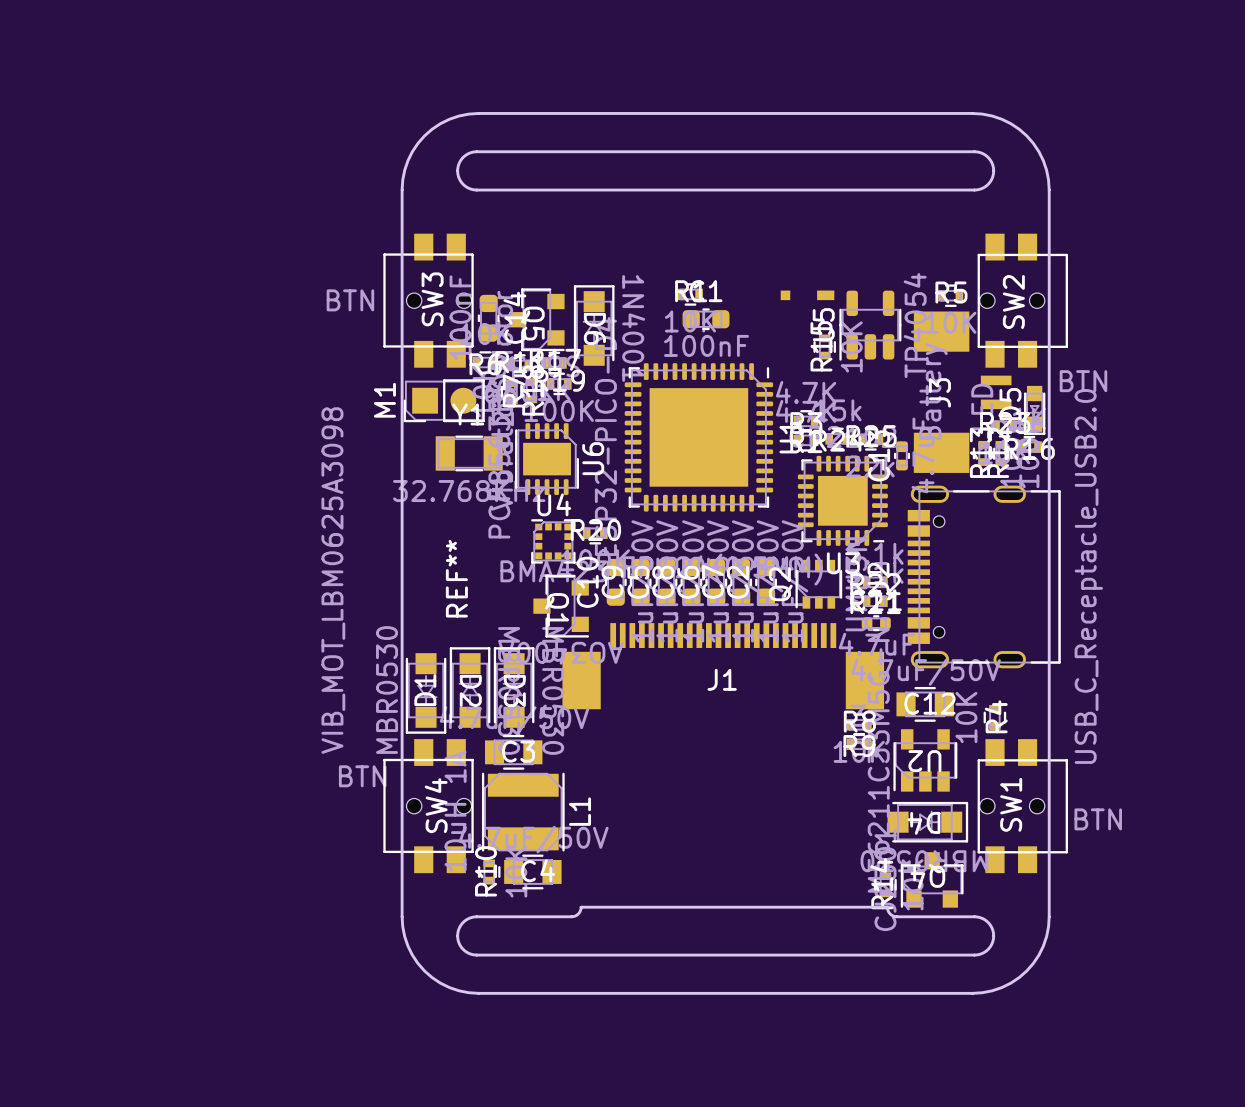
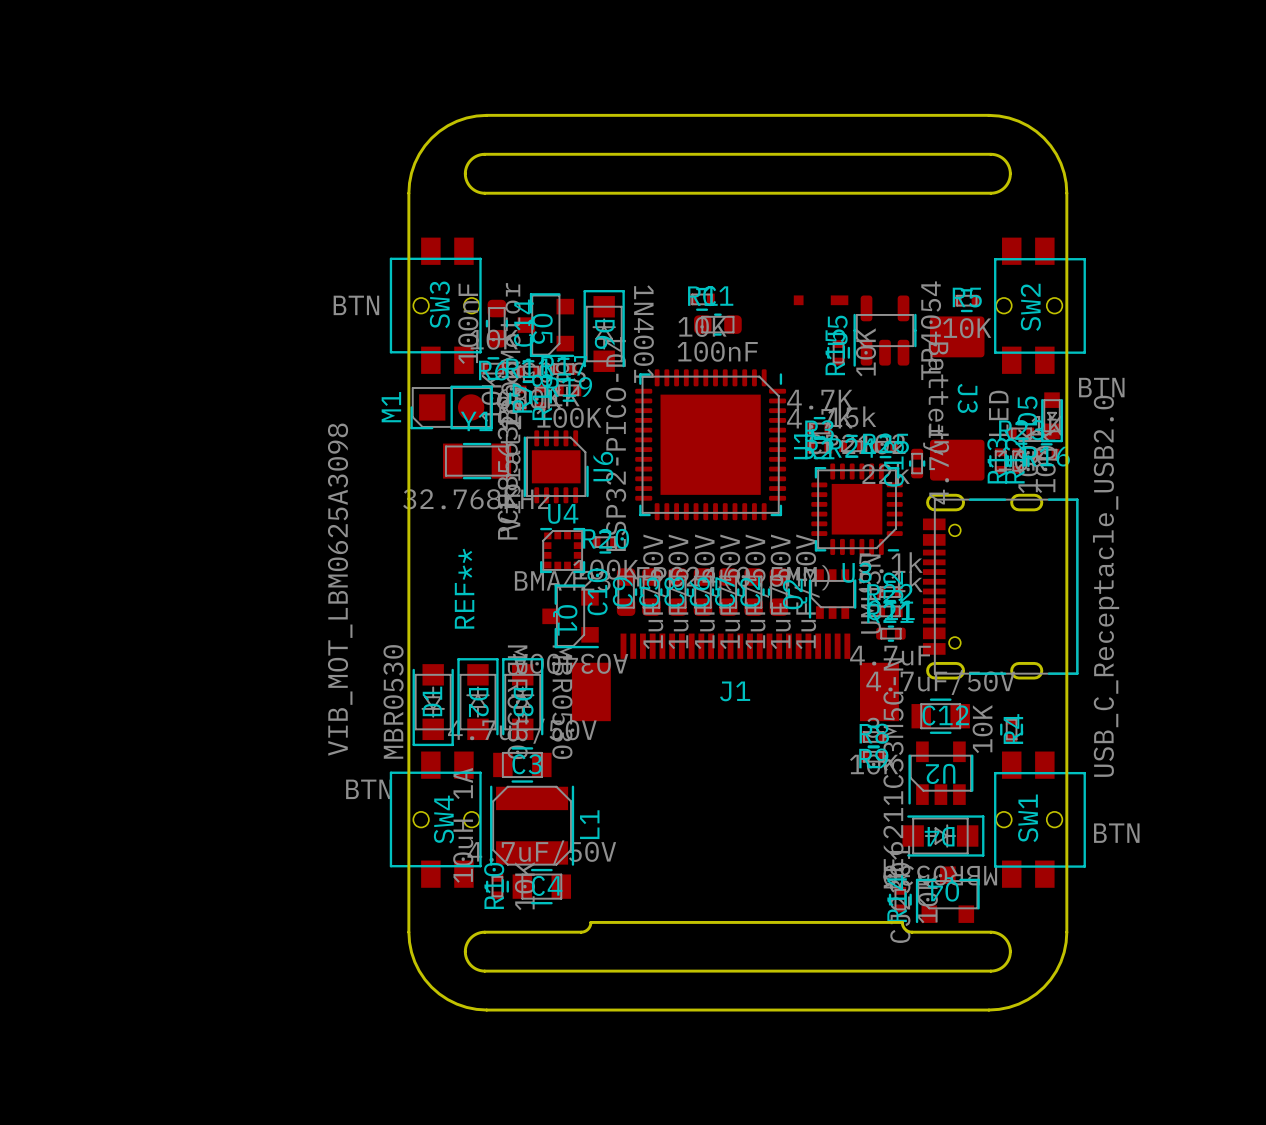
J3 footprint: [913, 311, 1012, 473] -> [929, 316, 985, 481]

